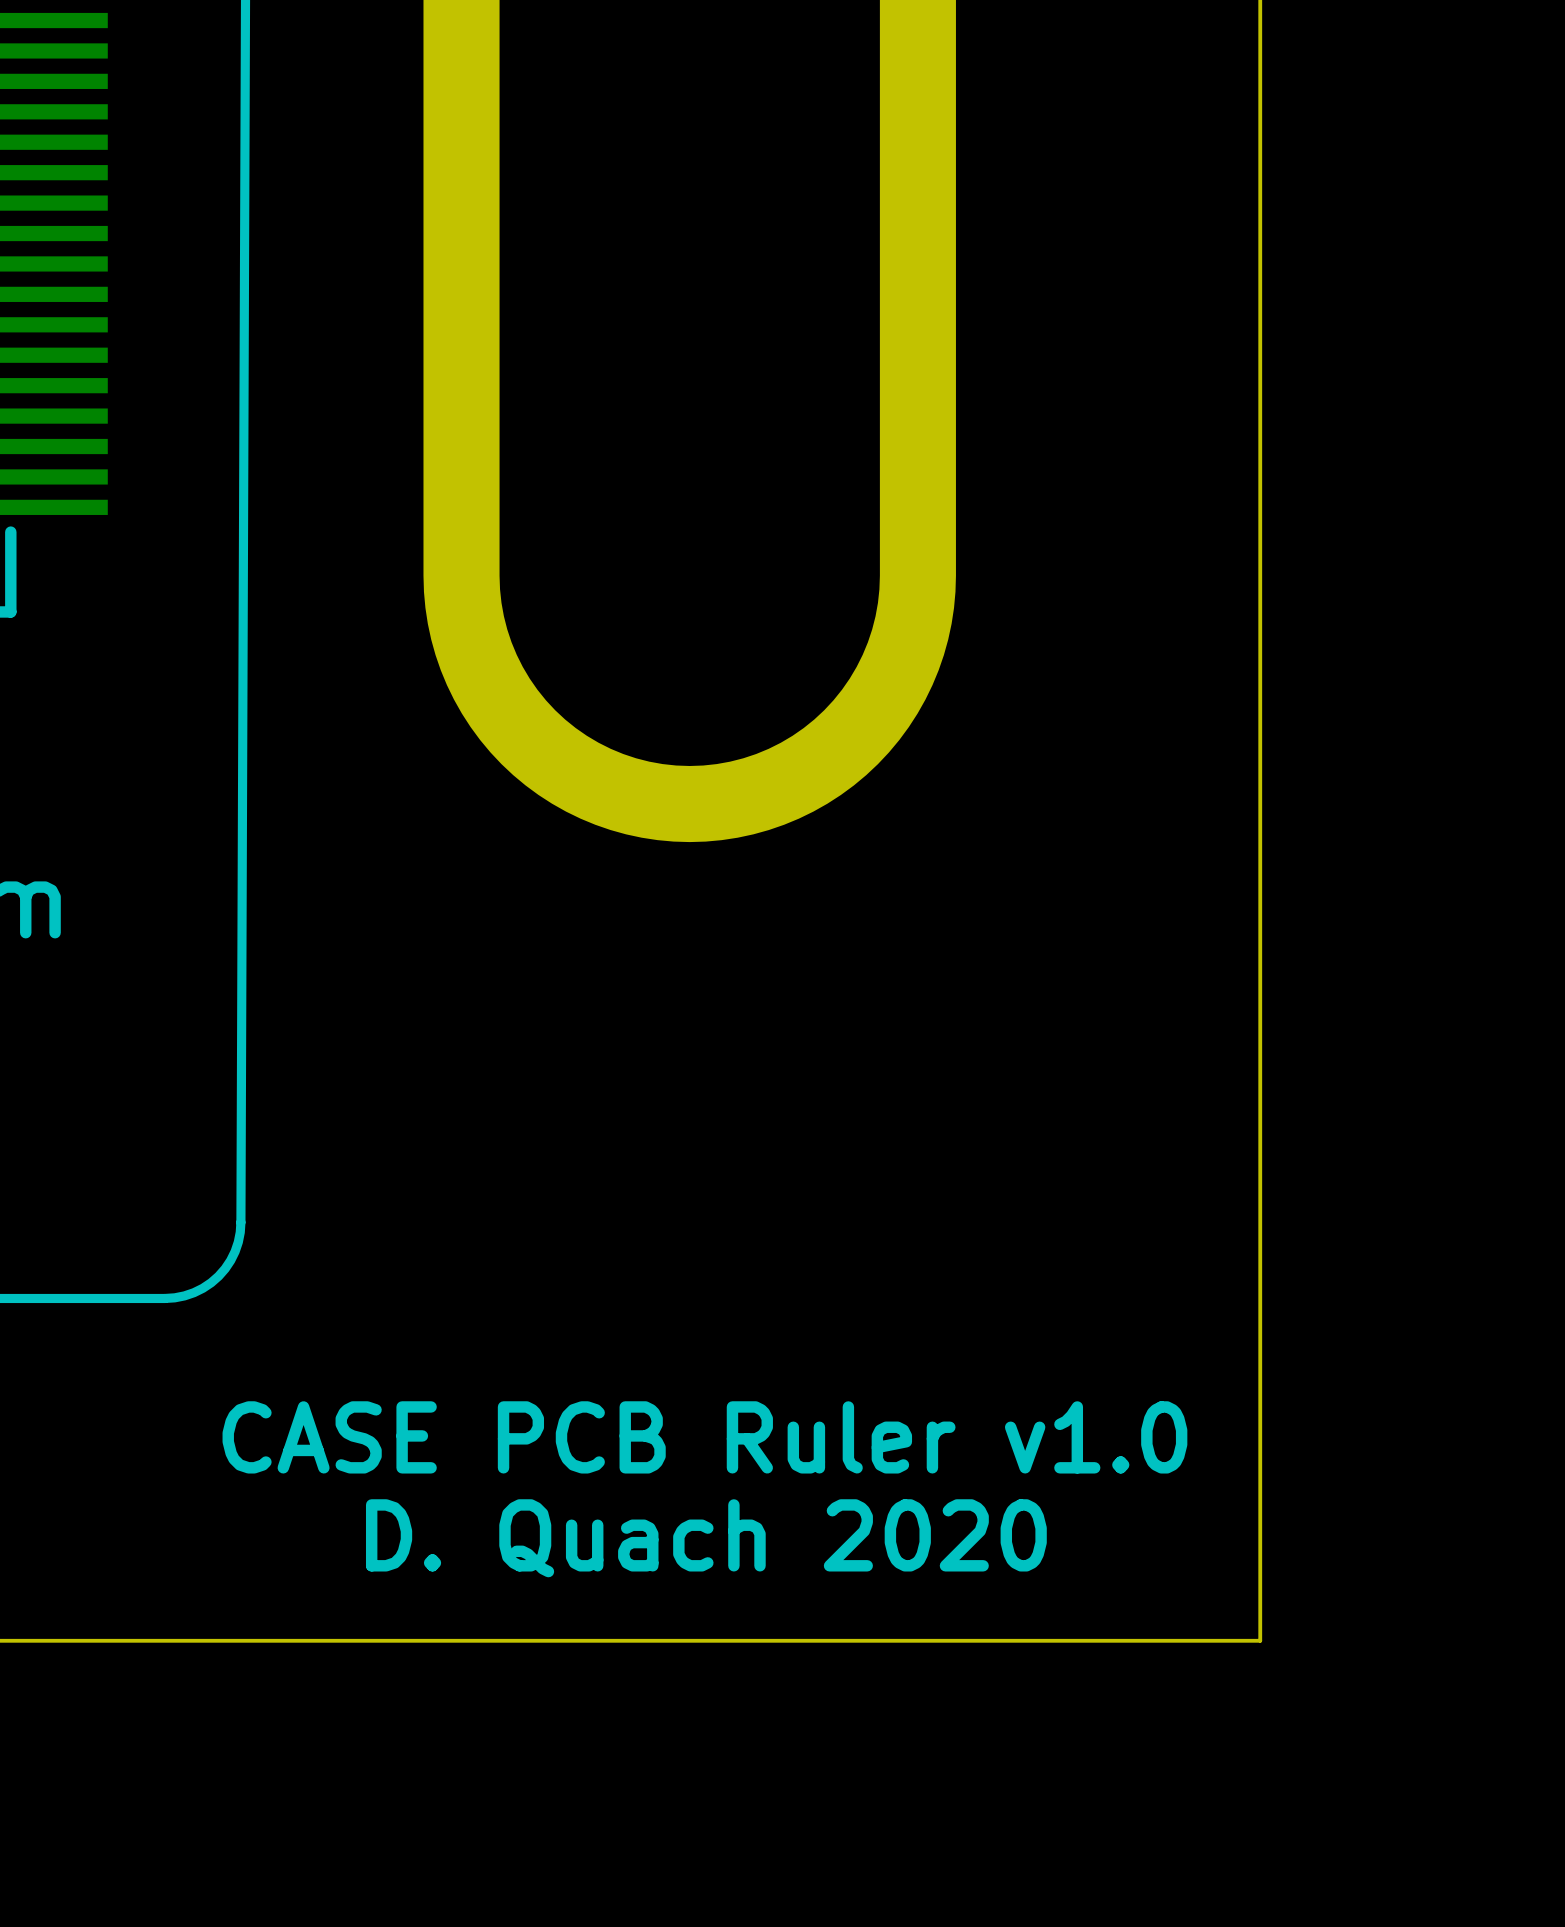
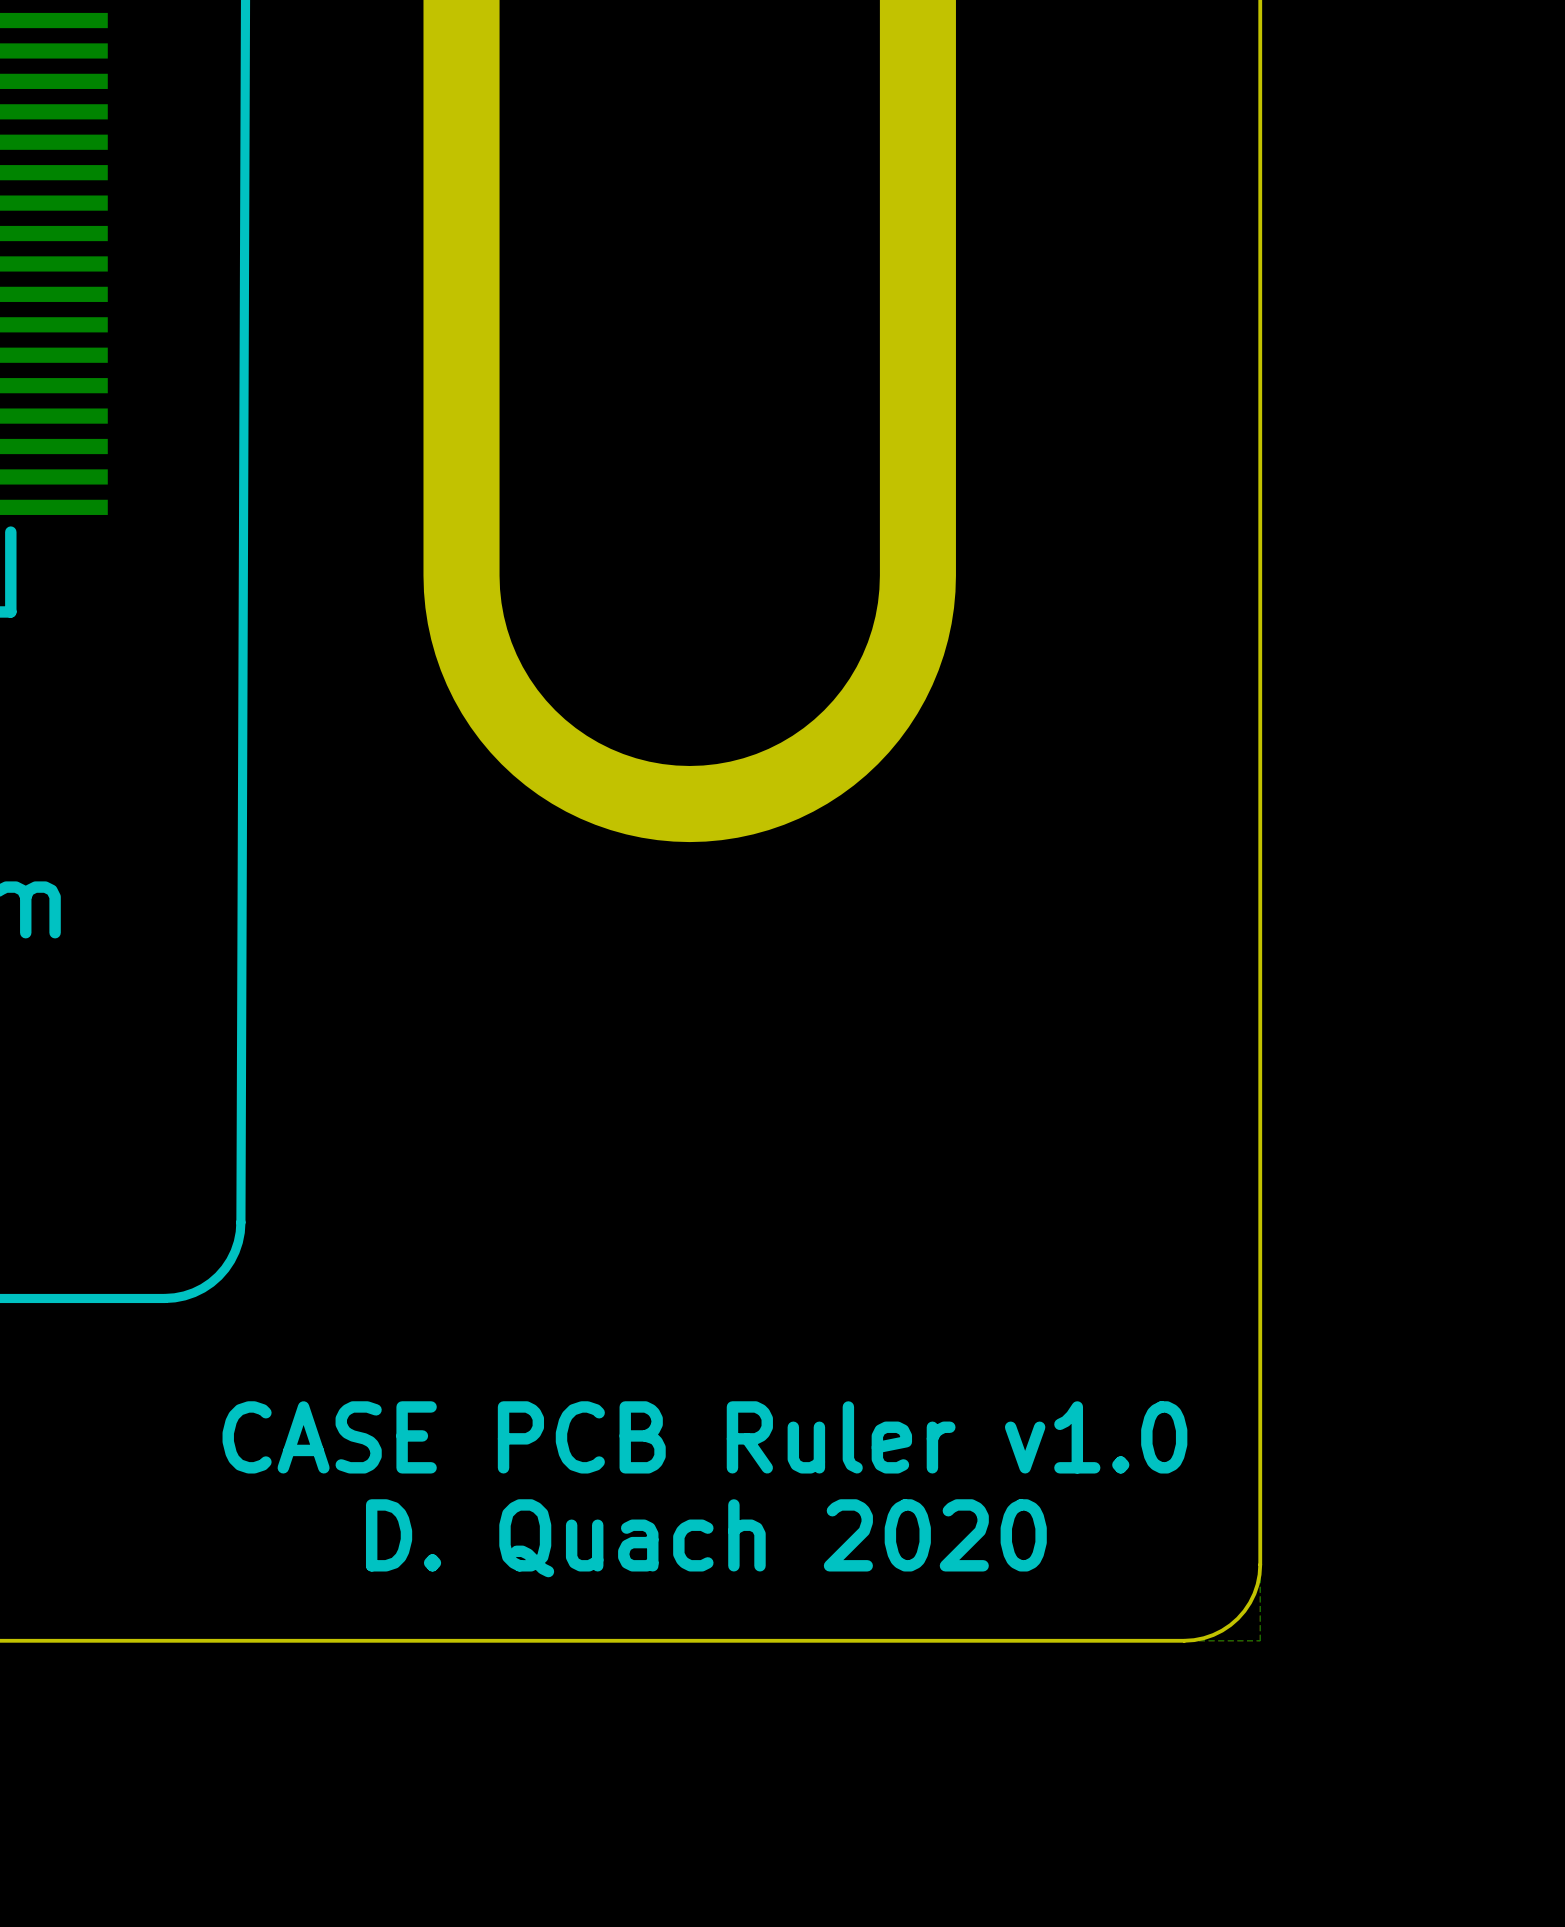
board edge: (1260, 1564) (1260, 1640) (1184, 1640) -> (1260, 1564) (1254, 1593) (1237, 1618) (1213, 1635) (1184, 1640)

